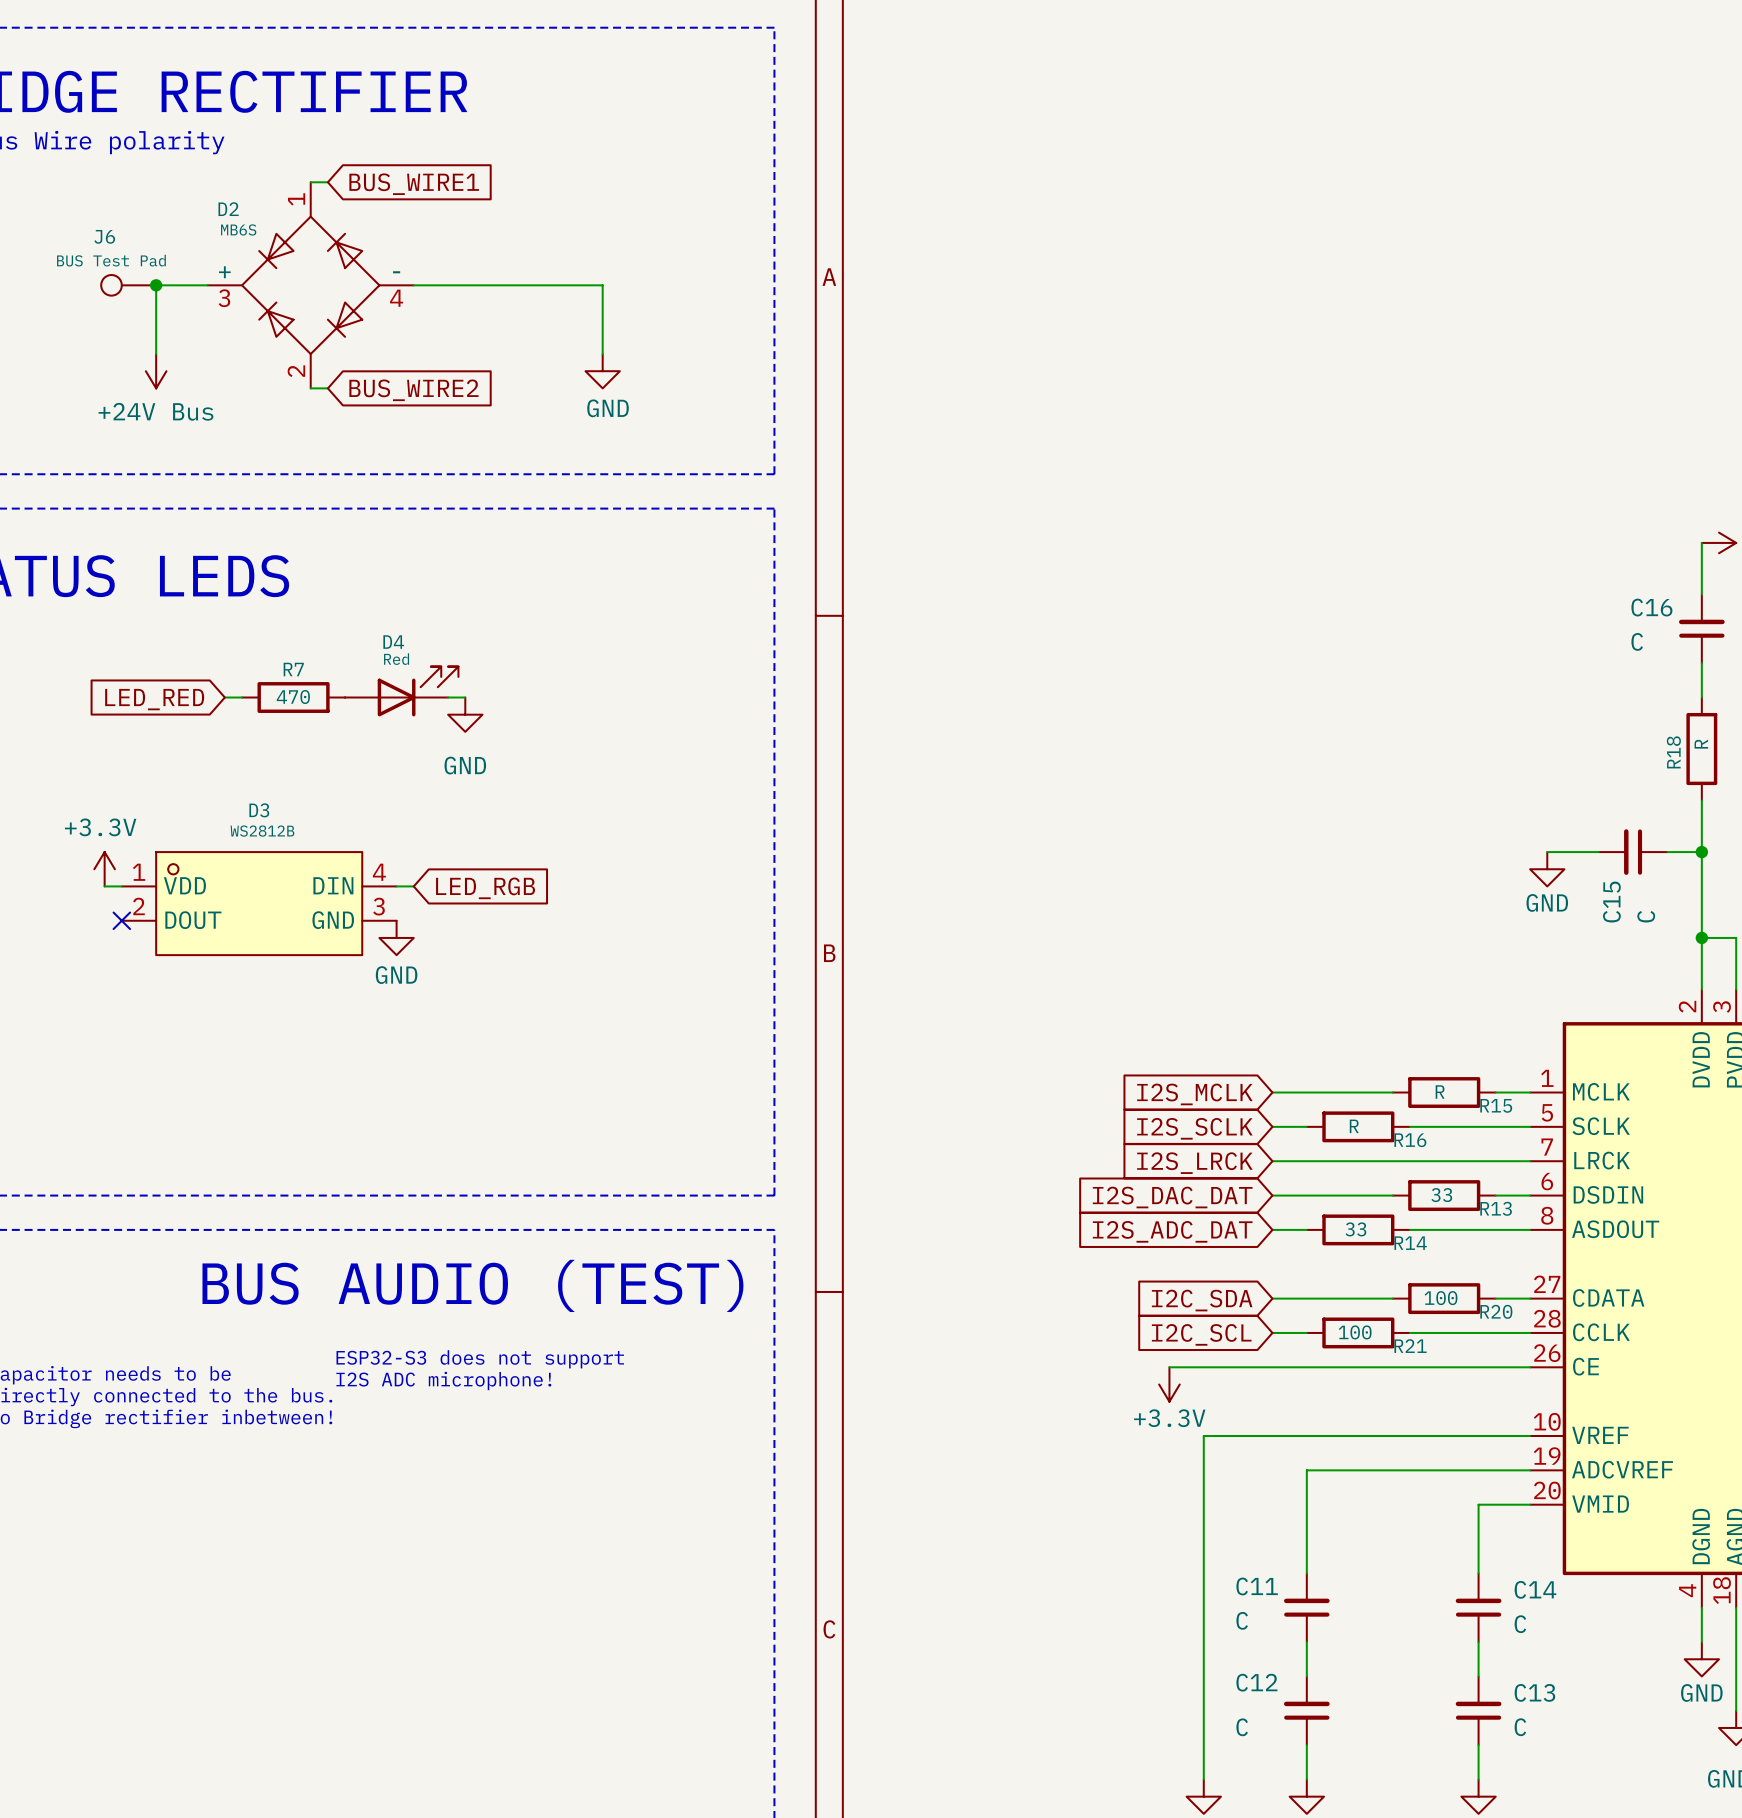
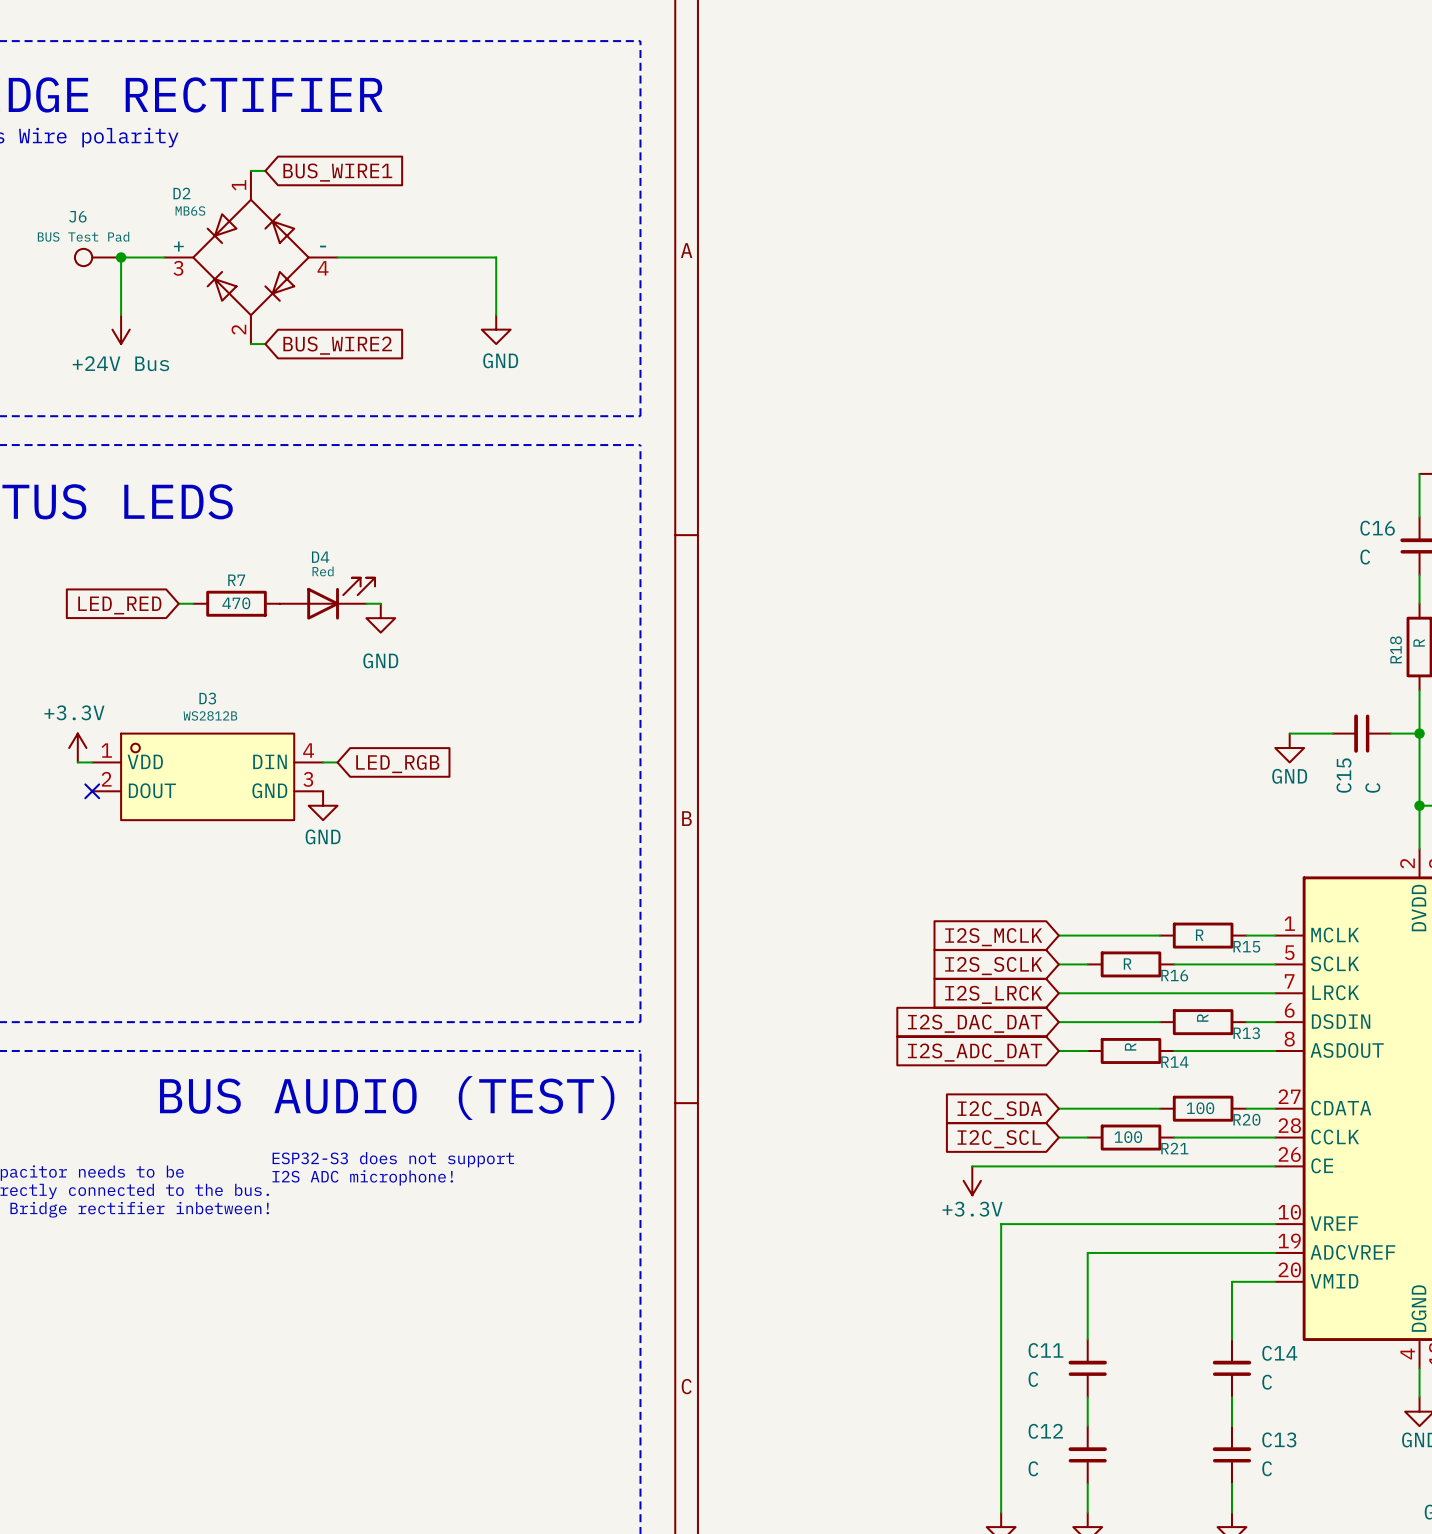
R13 value: 33 (1441, 1195) -> R (1202, 1018)
R14 value: 33 (1355, 1229) -> R (1130, 1046)

